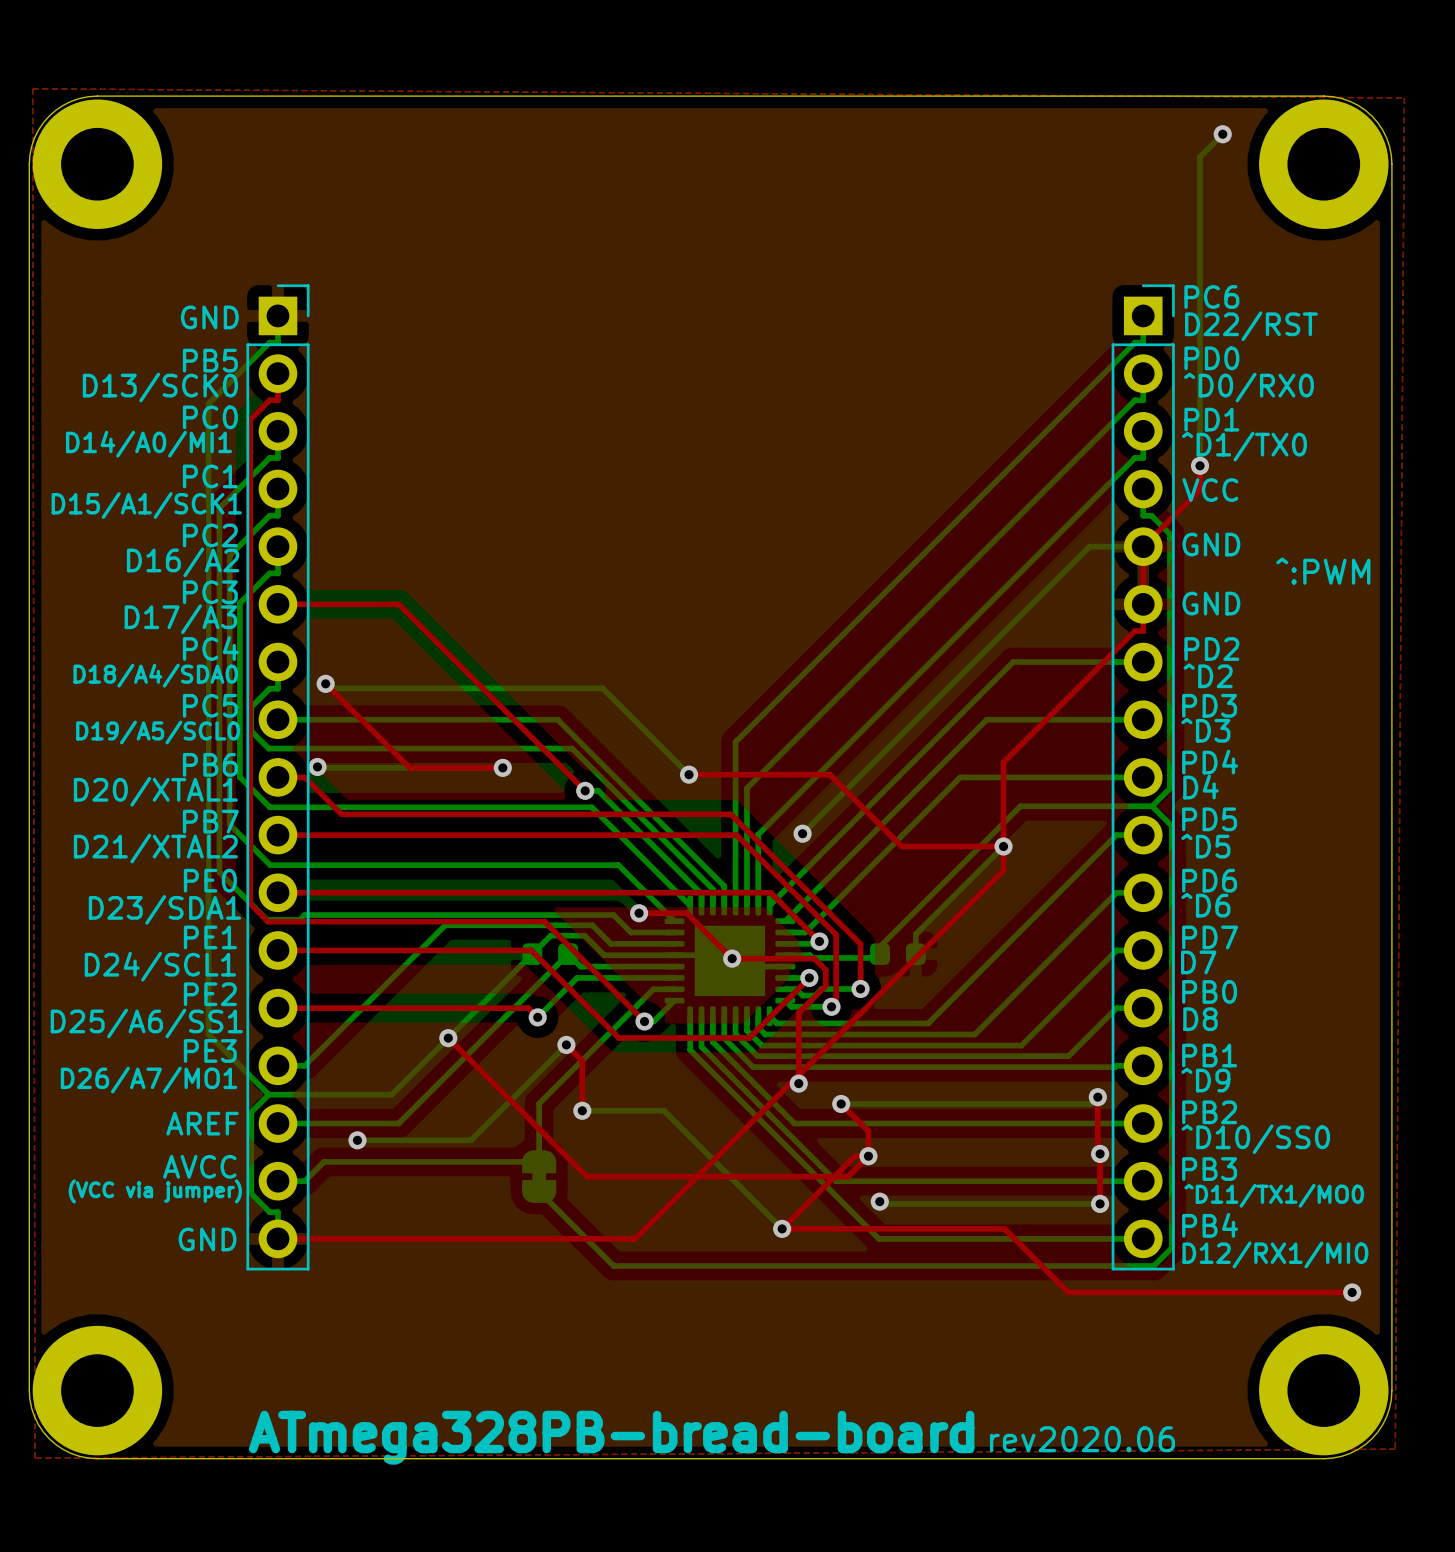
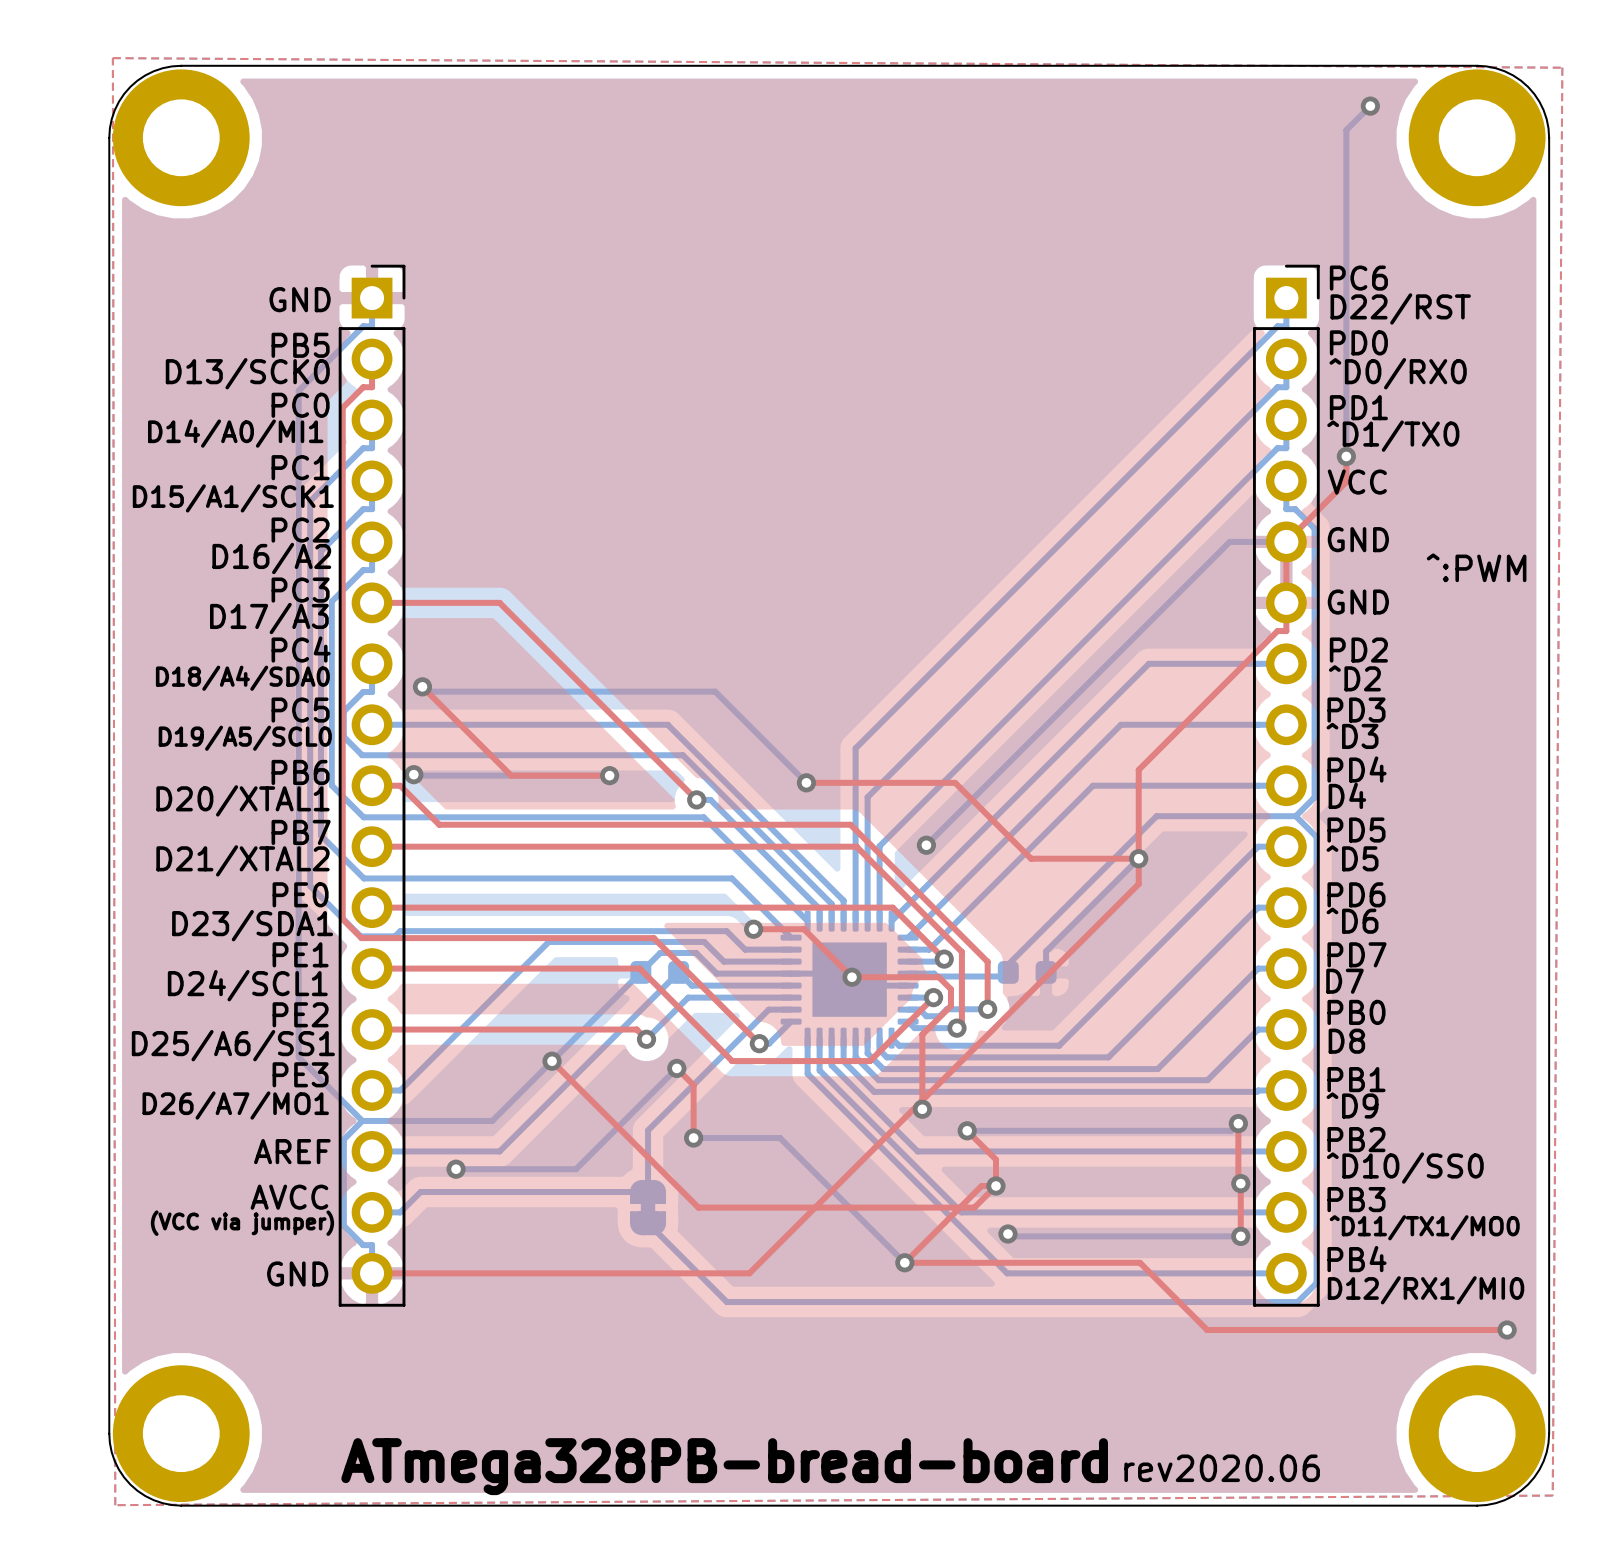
text position: ATmega328PB-bread-board (611, 1437) -> ATmega328PB-bread-board (724, 1466)
text position: rev2020.06 (1082, 1439) -> rev2020.06 (1222, 1468)

